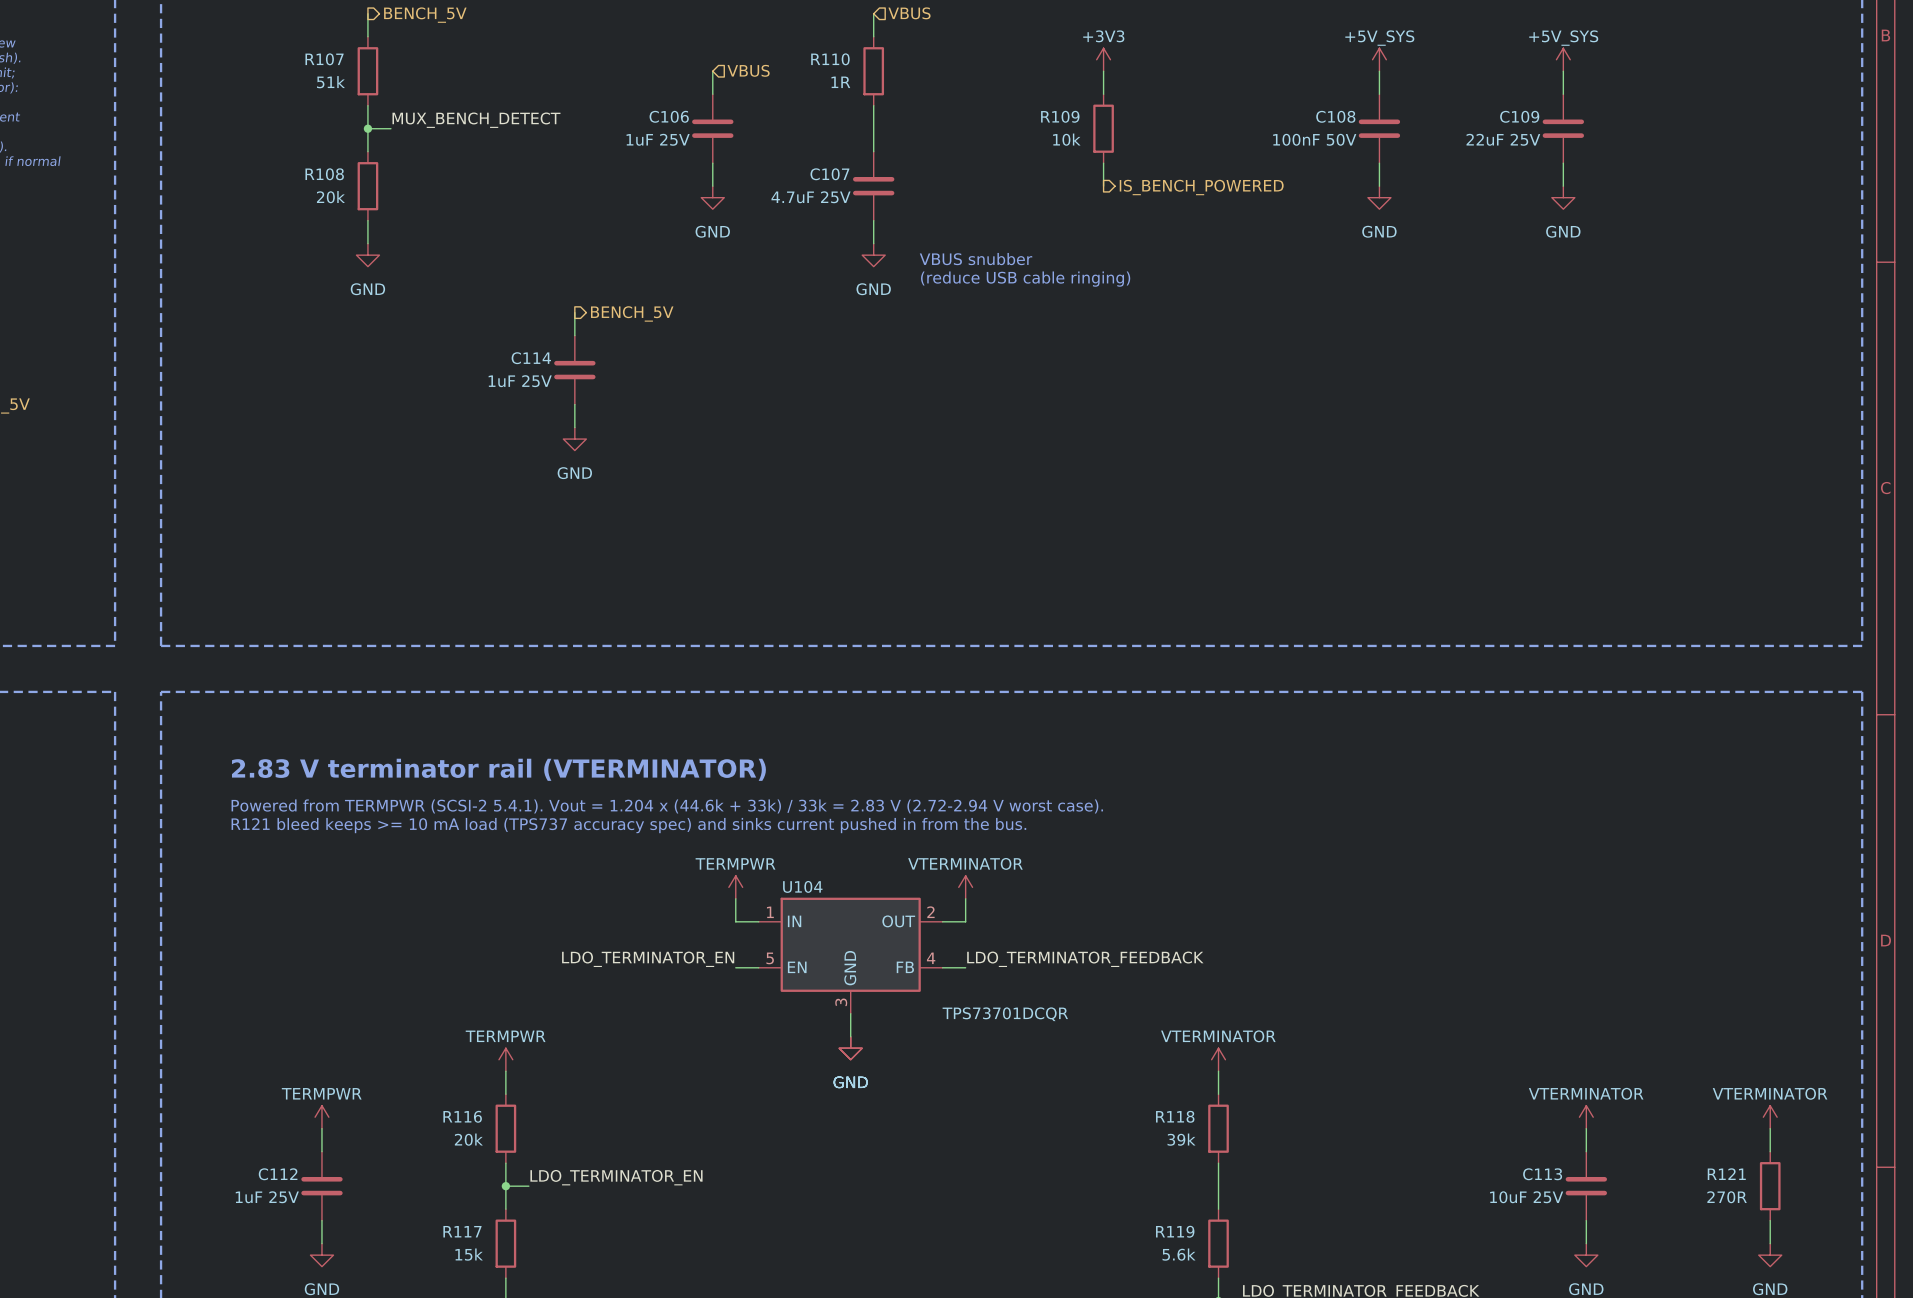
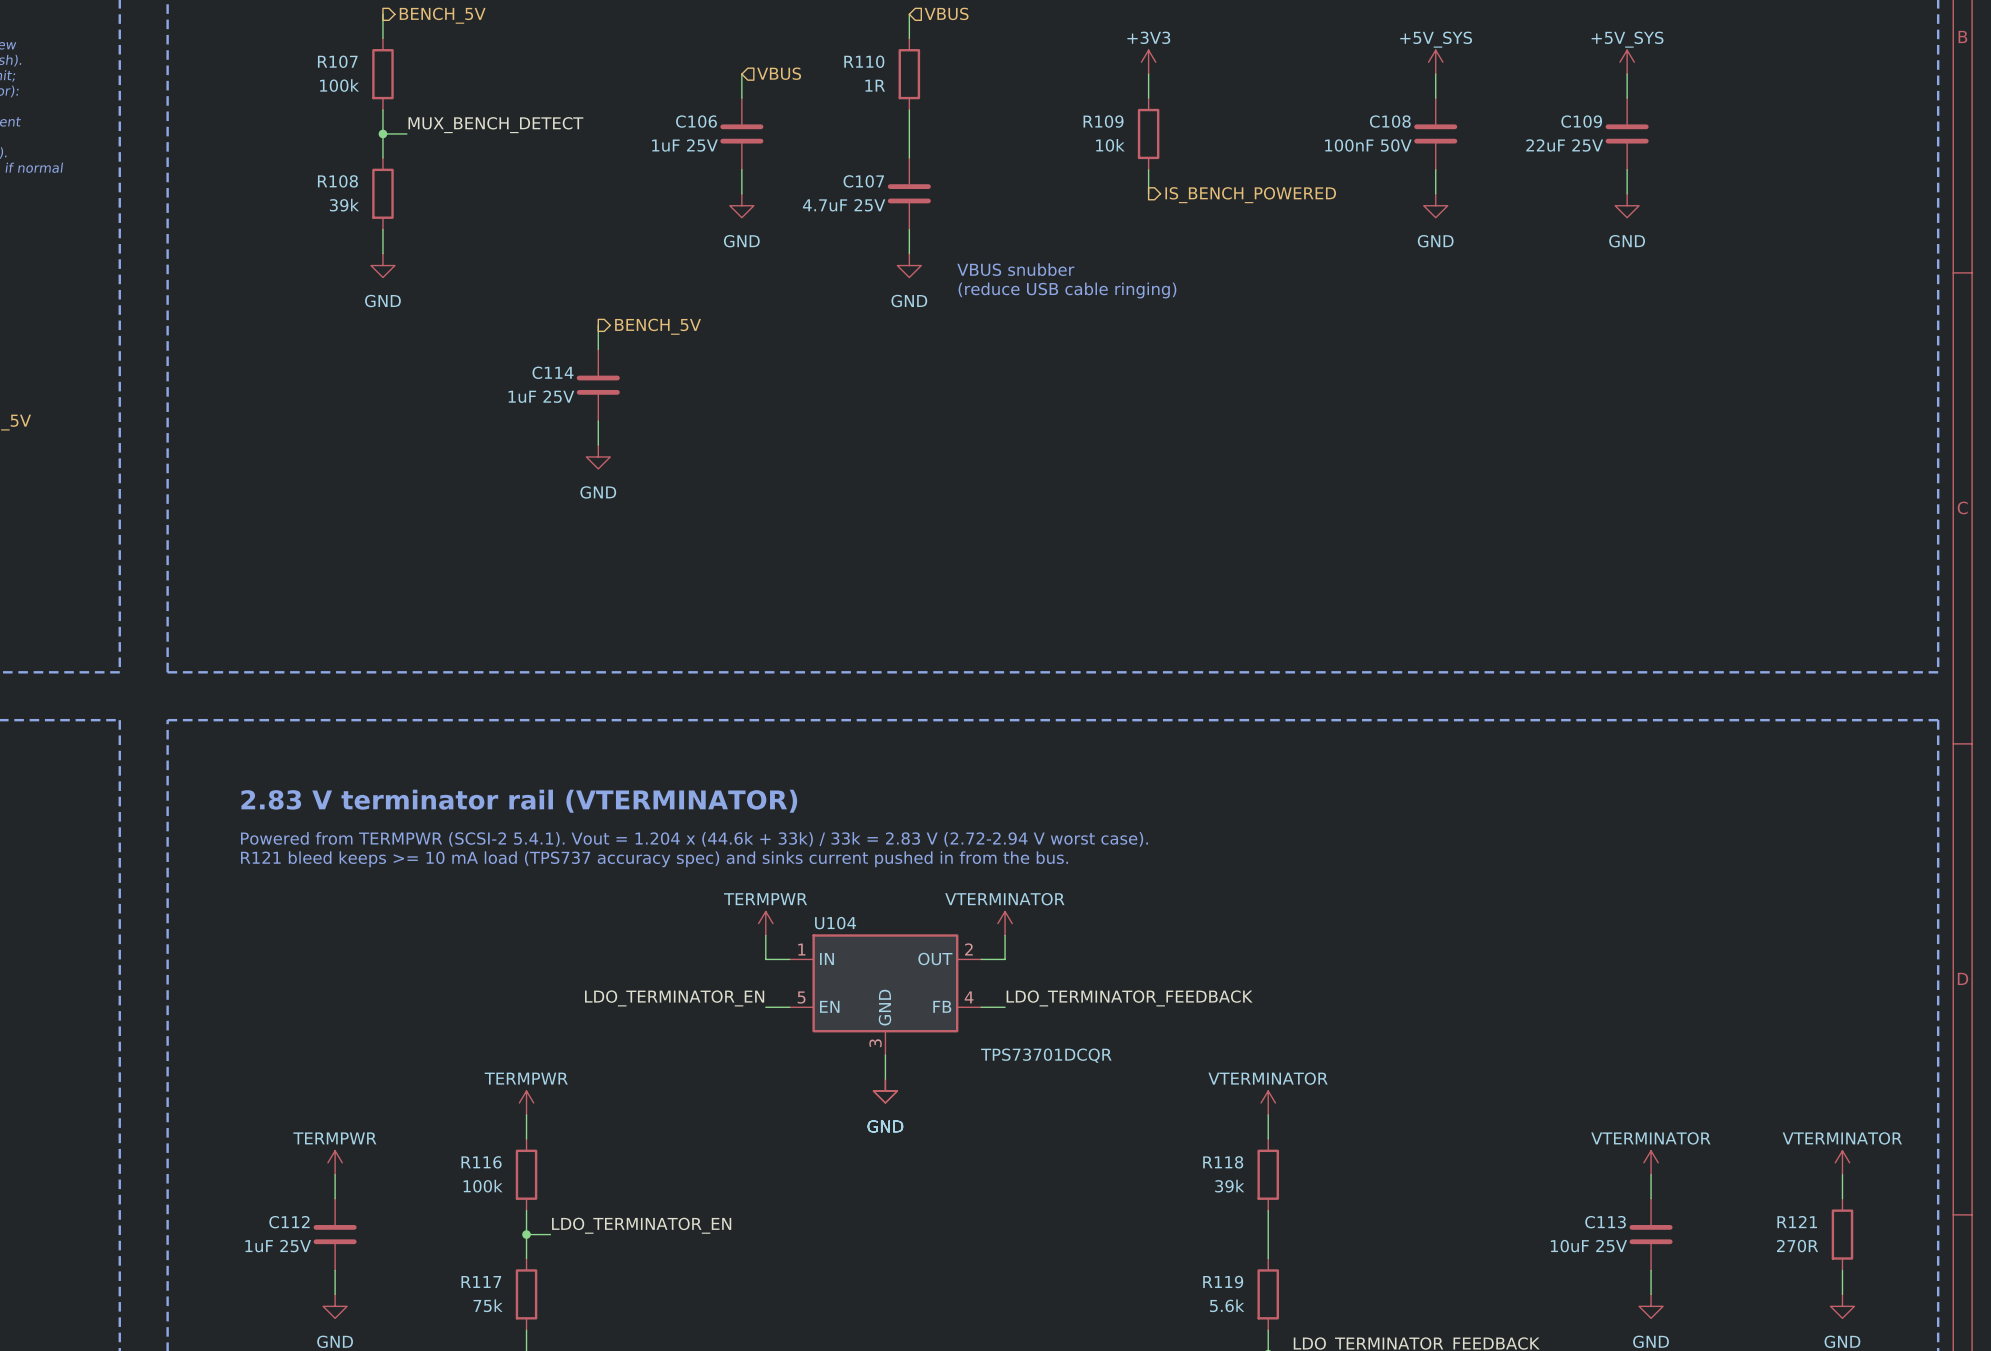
R107 value: 51k (330, 82) -> 100k (339, 85)
R108 value: 20k (330, 197) -> 39k (344, 205)
R116 value: 20k (468, 1139) -> 100k (483, 1186)
R117 value: 15k (469, 1254) -> 75k (488, 1305)

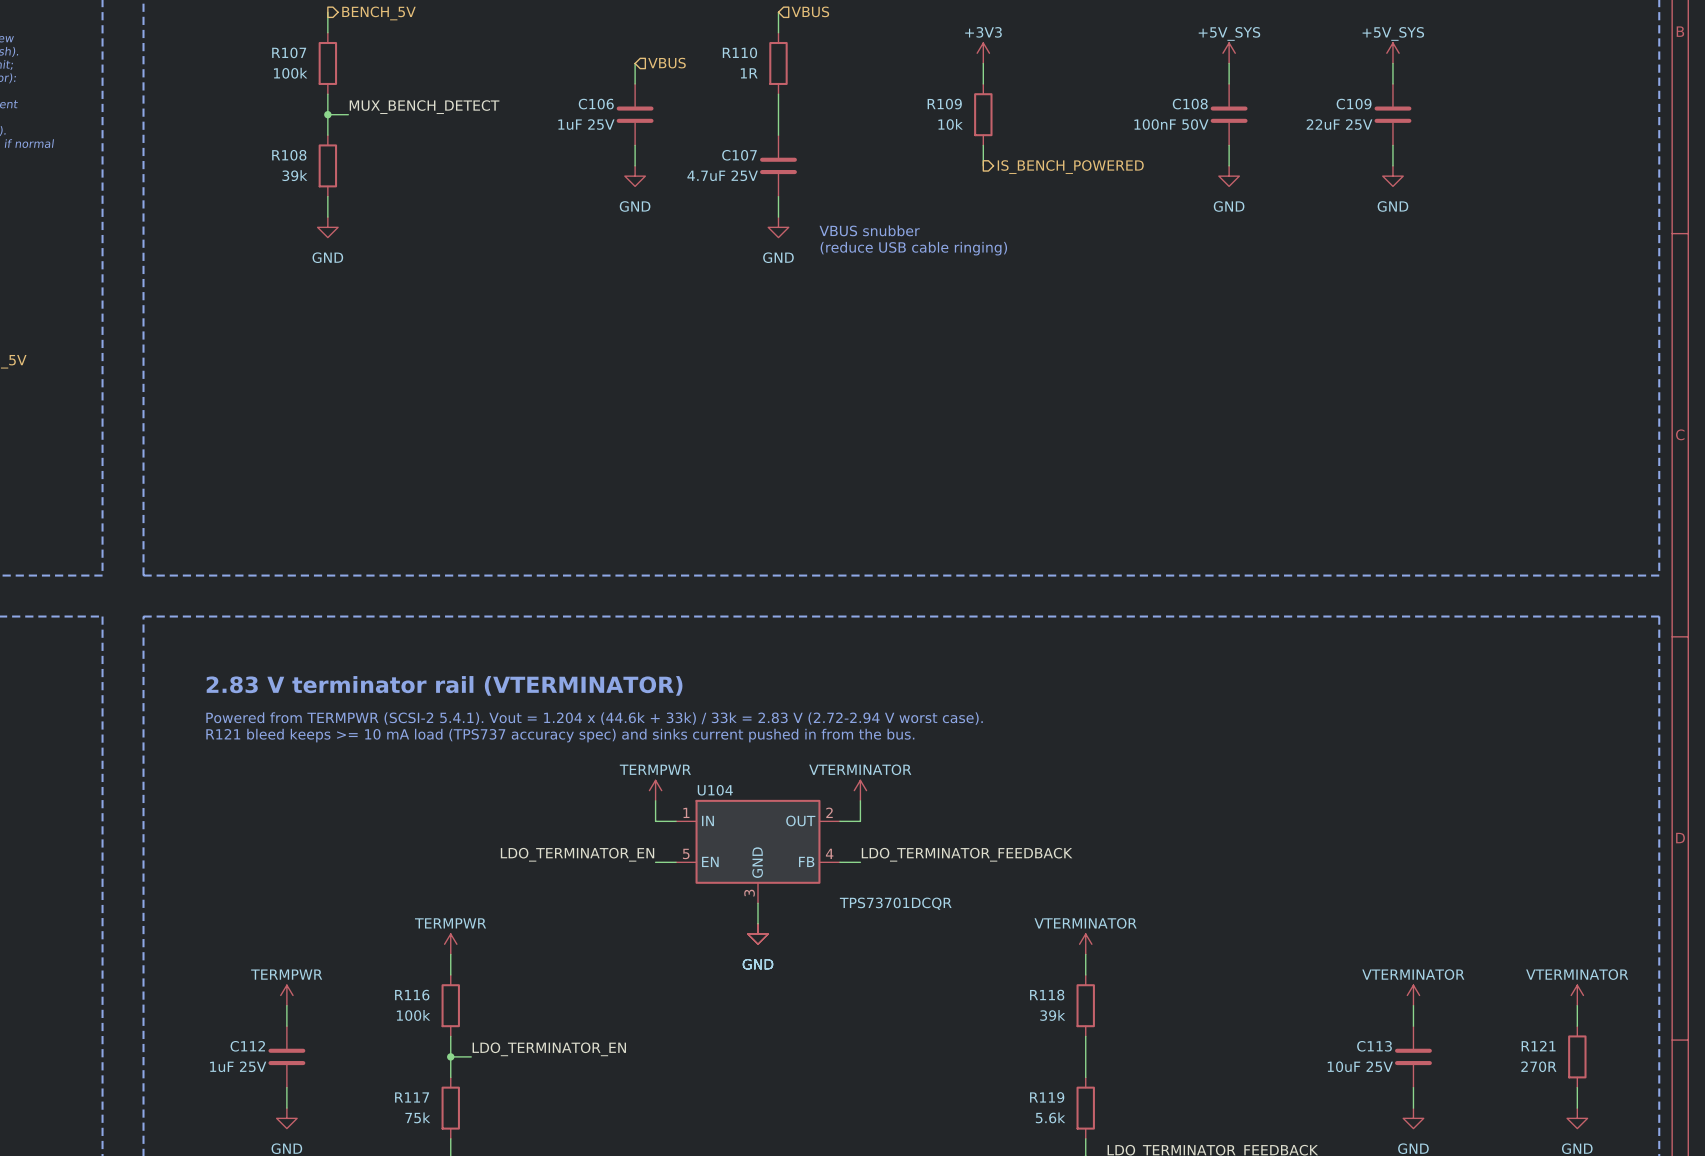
wire: (598, 325) (598, 349) -> none
hierarchical label: BENCH_5V (658, 326) -> none
C114: 1uF 25V (598, 385) -> none
wire: (598, 421) (598, 445) -> none
power symbol: GND (598, 456) -> none

